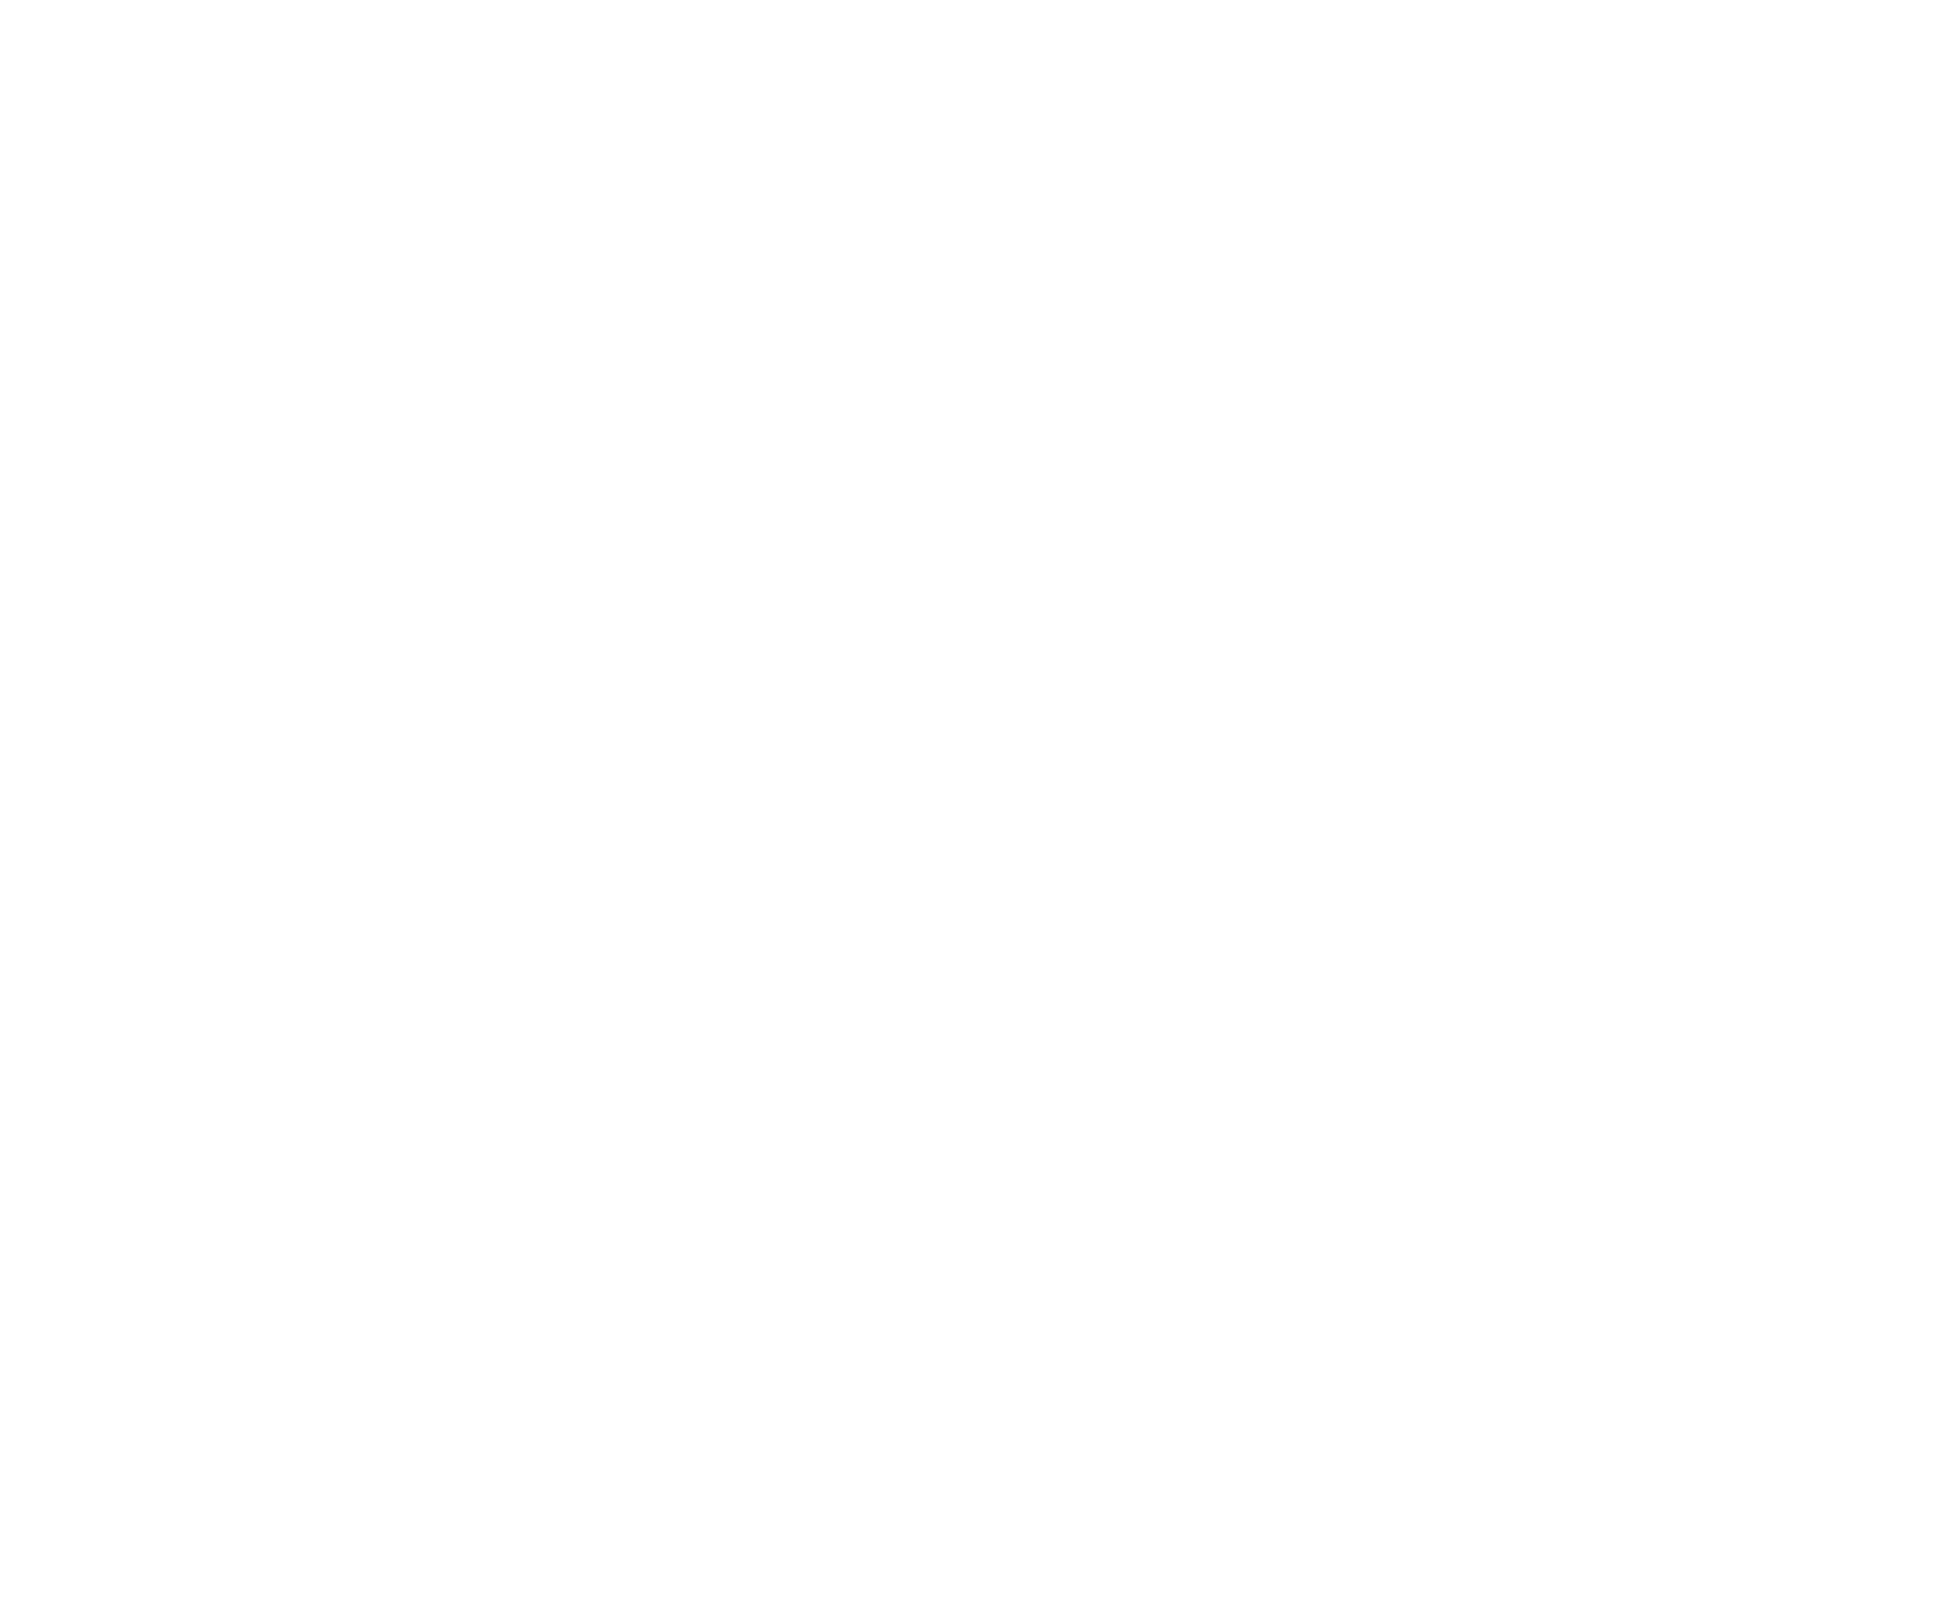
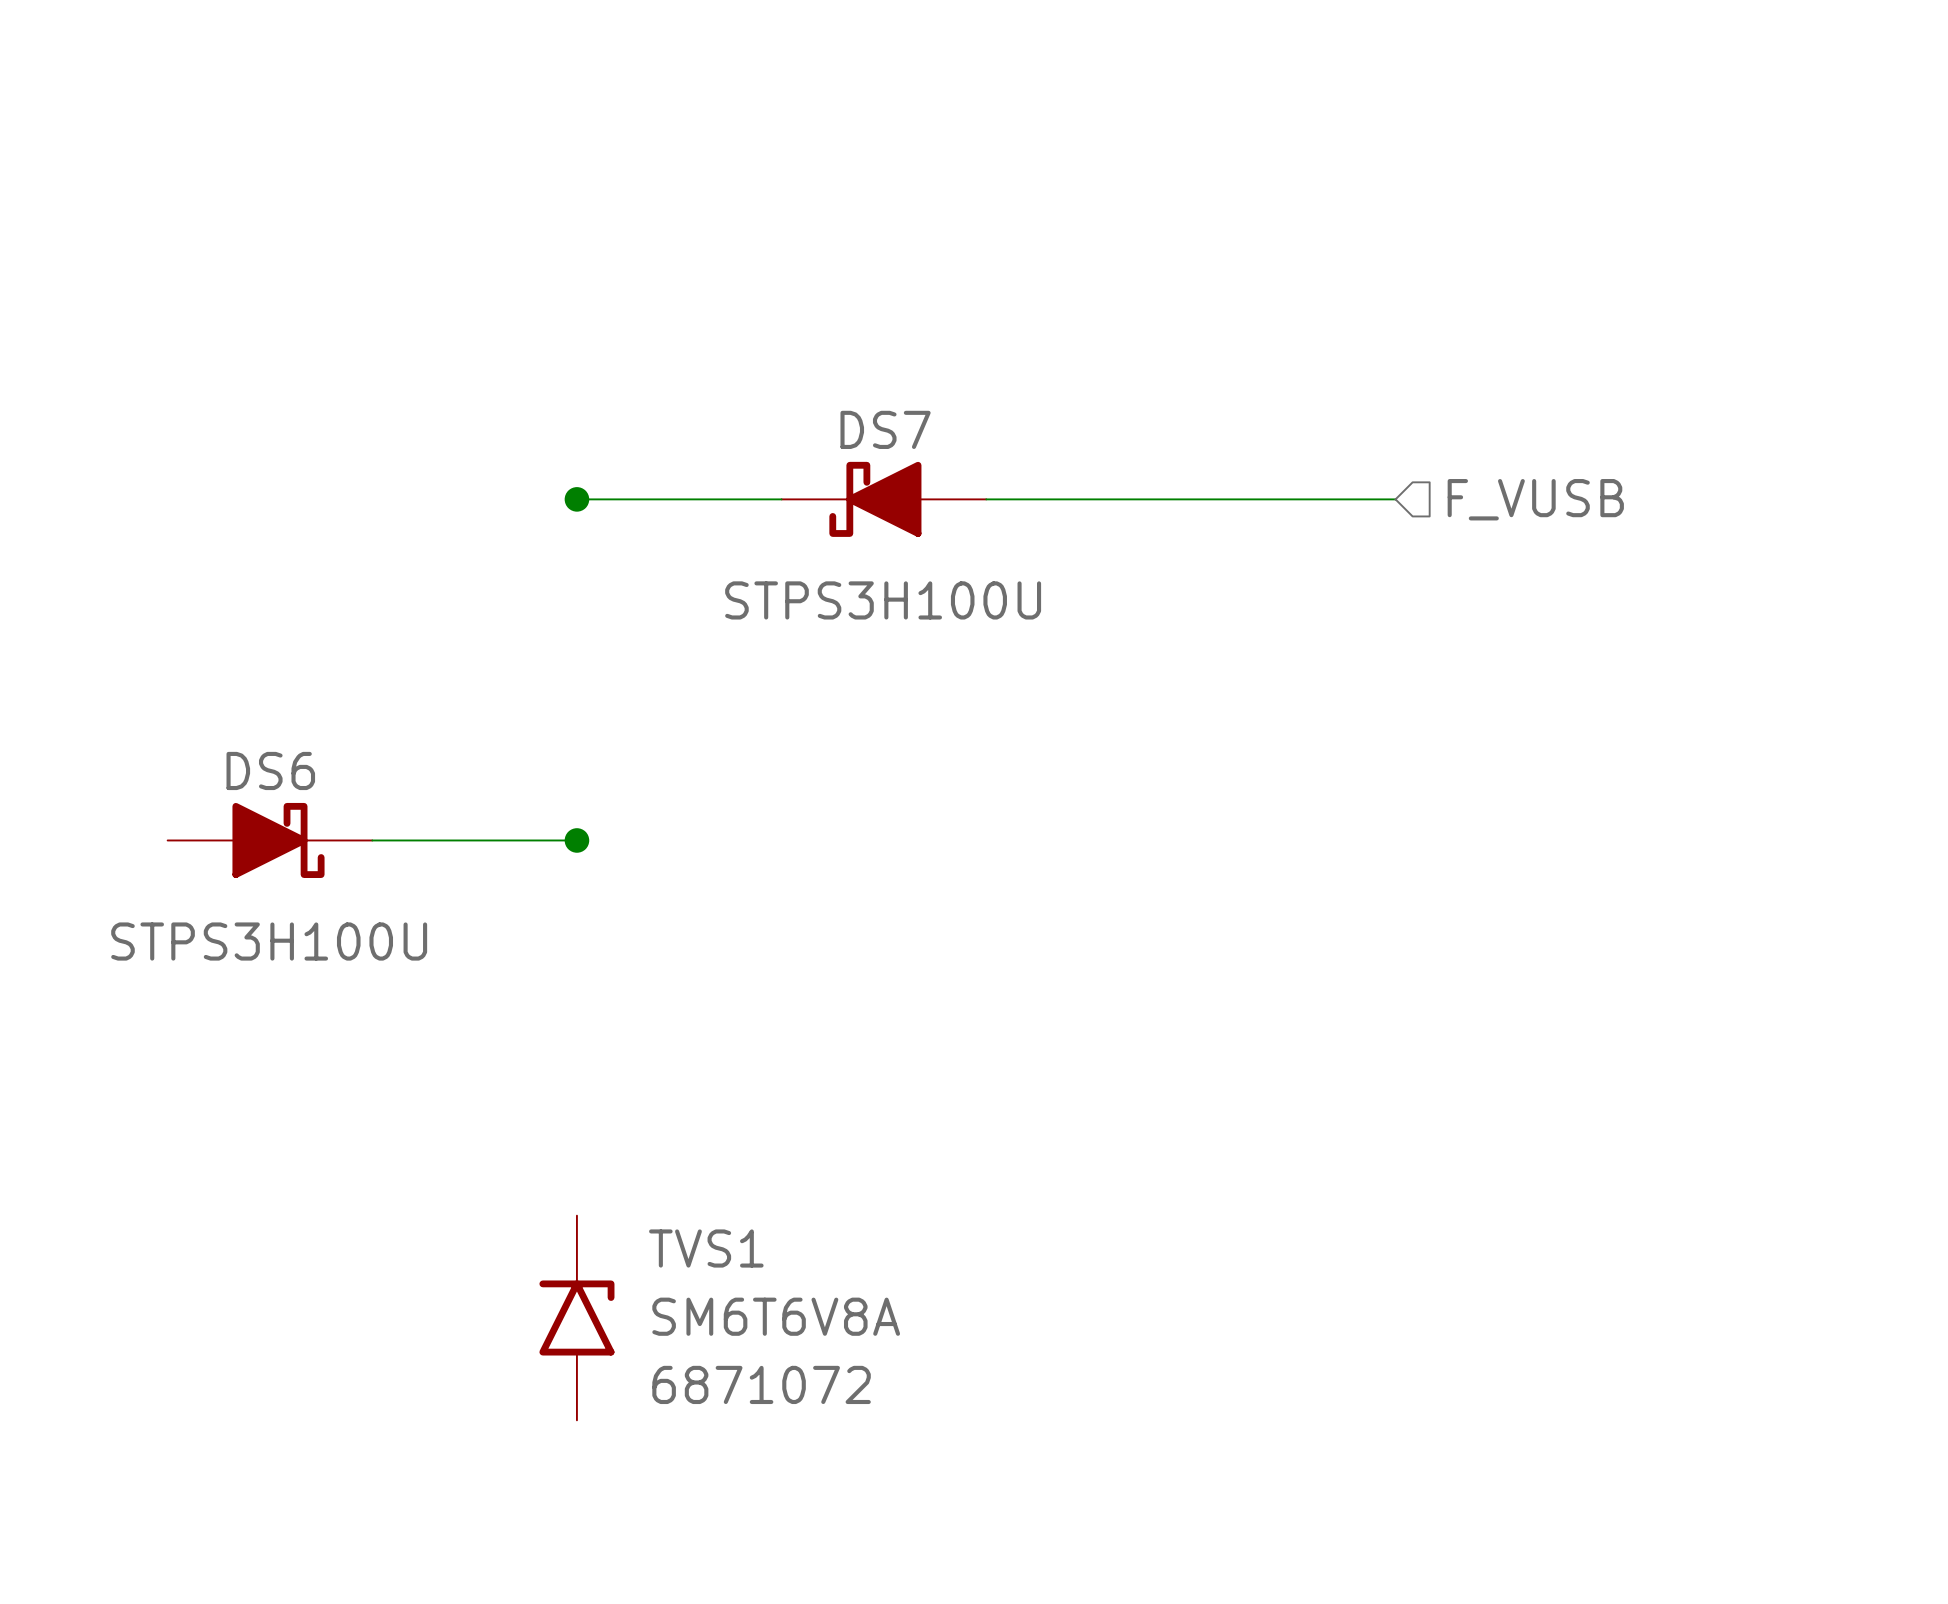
wire: none -> (576, 499) (781, 499)
junction: none -> (576, 499)
DS7: none -> STPS3H100U (883, 499)
wire: none -> (986, 499) (1395, 499)
hierarchical label: none -> F_VUSB (1535, 499)
DS6: none -> STPS3H100U (269, 840)
wire: none -> (372, 840) (576, 840)
junction: none -> (576, 840)
TVS1: none -> SM6T6V8A (576, 1317)

